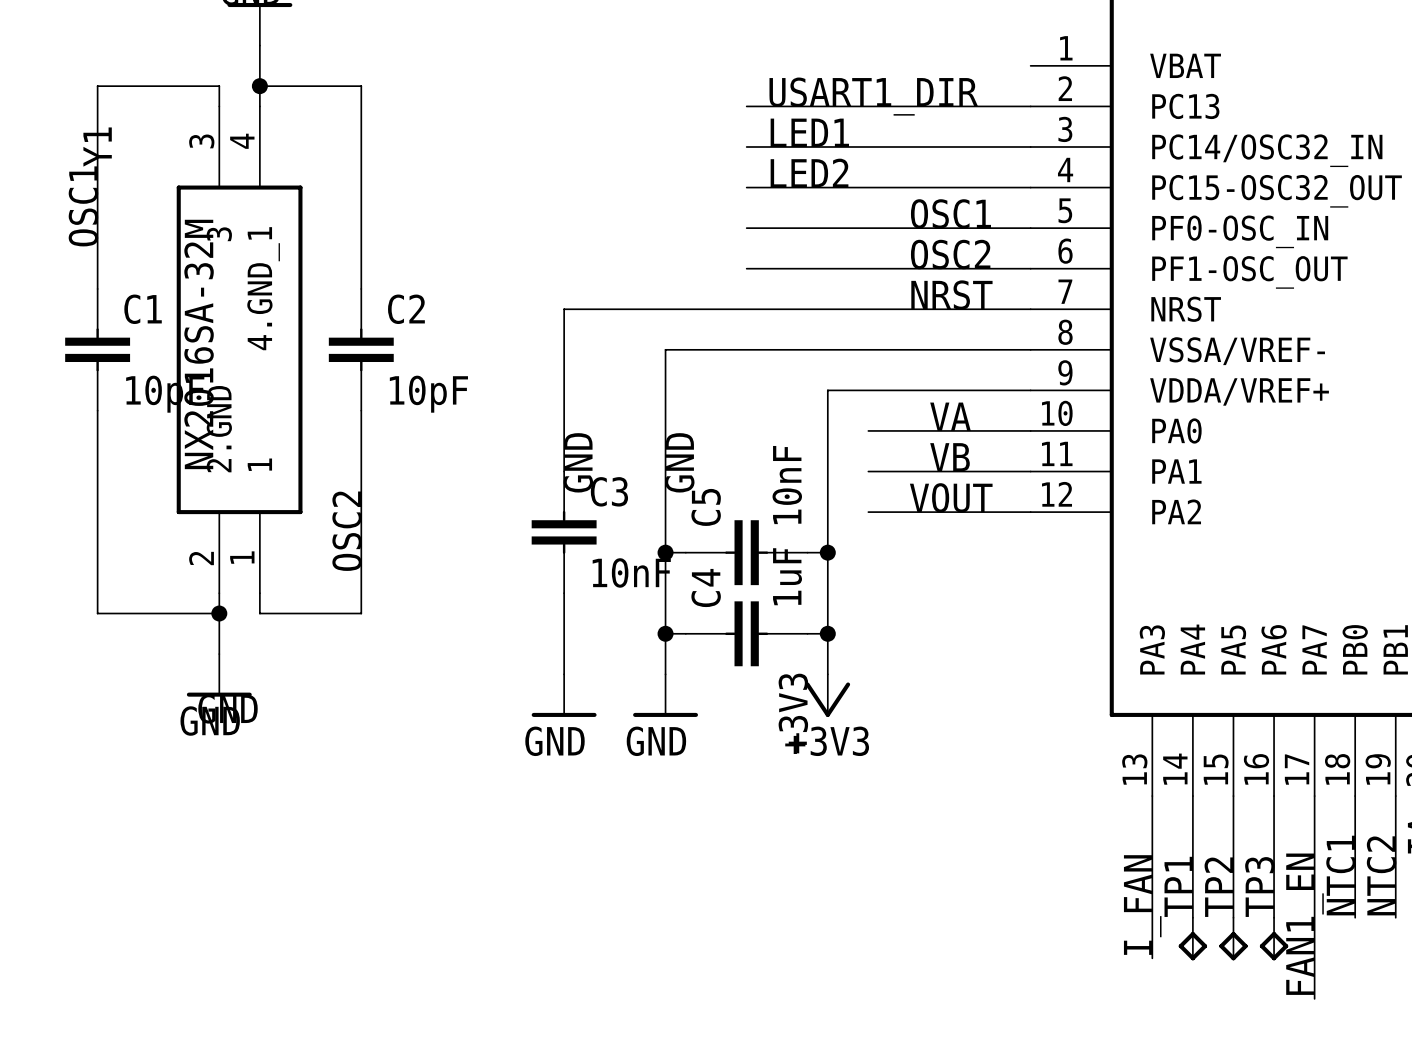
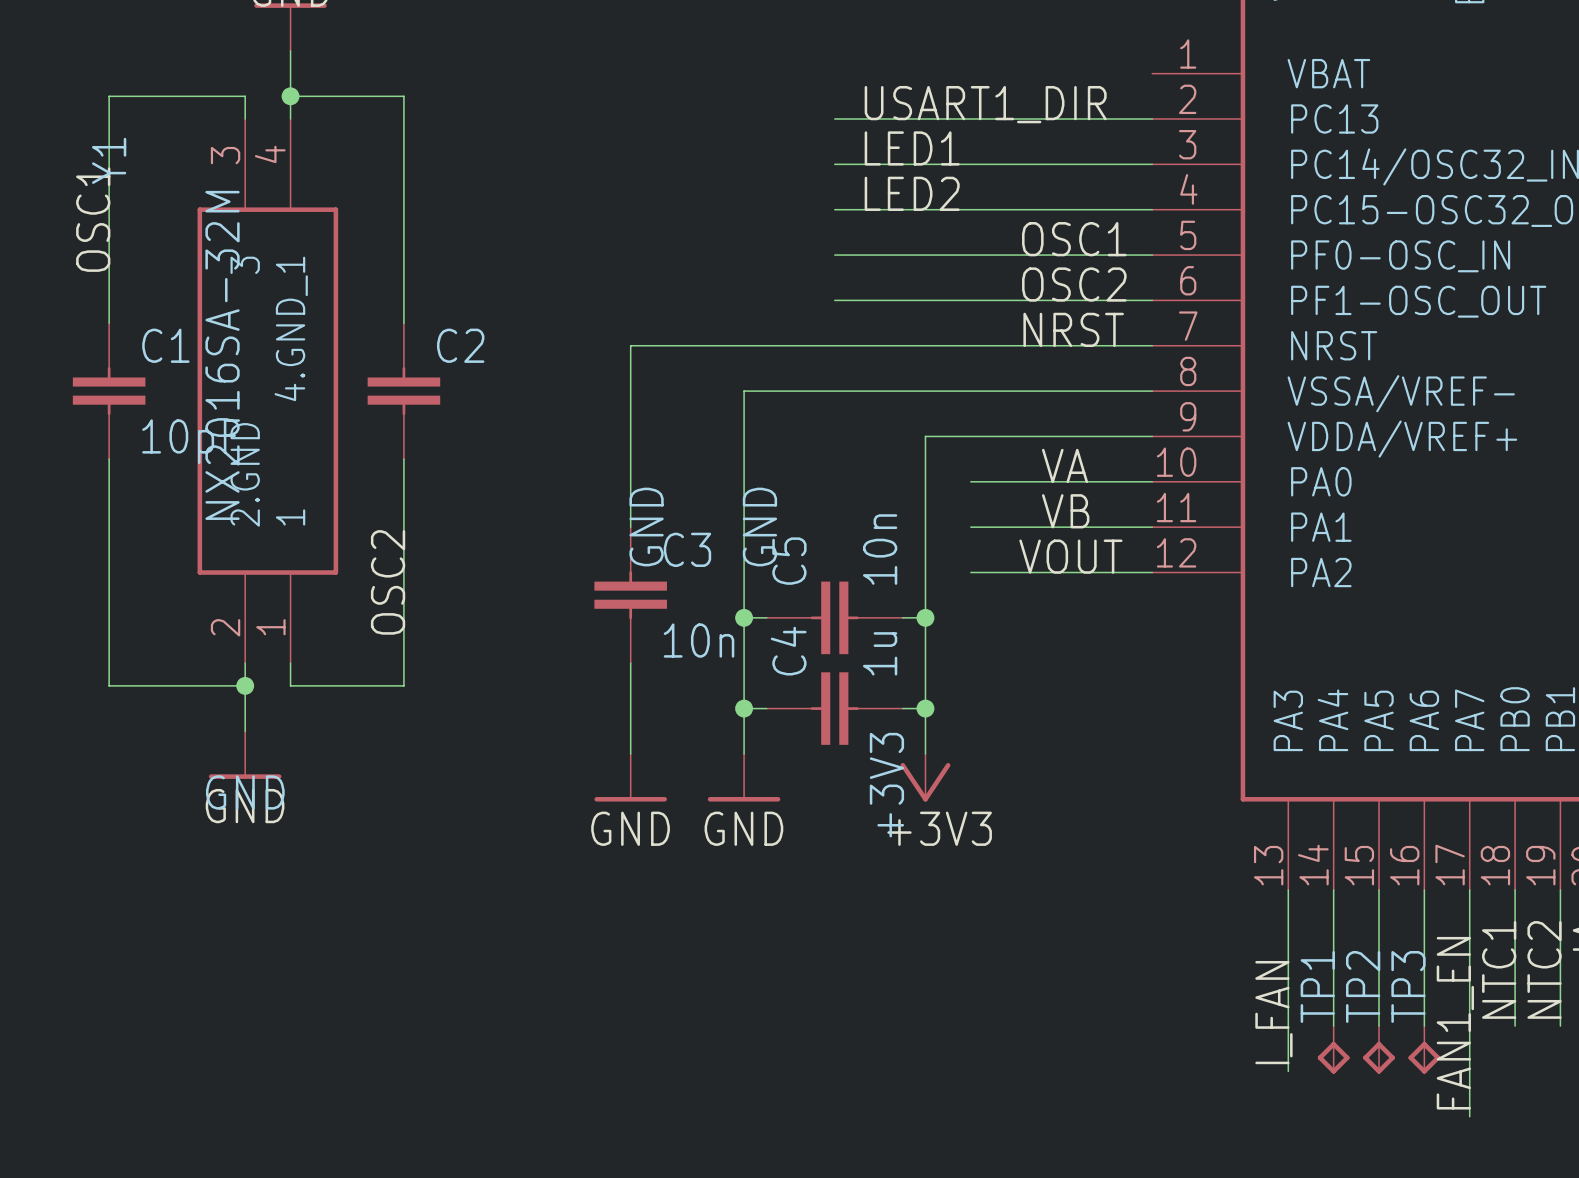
C2 value: 10pF (428, 394) -> none
C5 value: 10nF (787, 485) -> 10n (880, 549)
C3 value: 10nF (631, 572) -> 10n (699, 640)
C4 value: 1uF (787, 576) -> 1u (880, 653)

